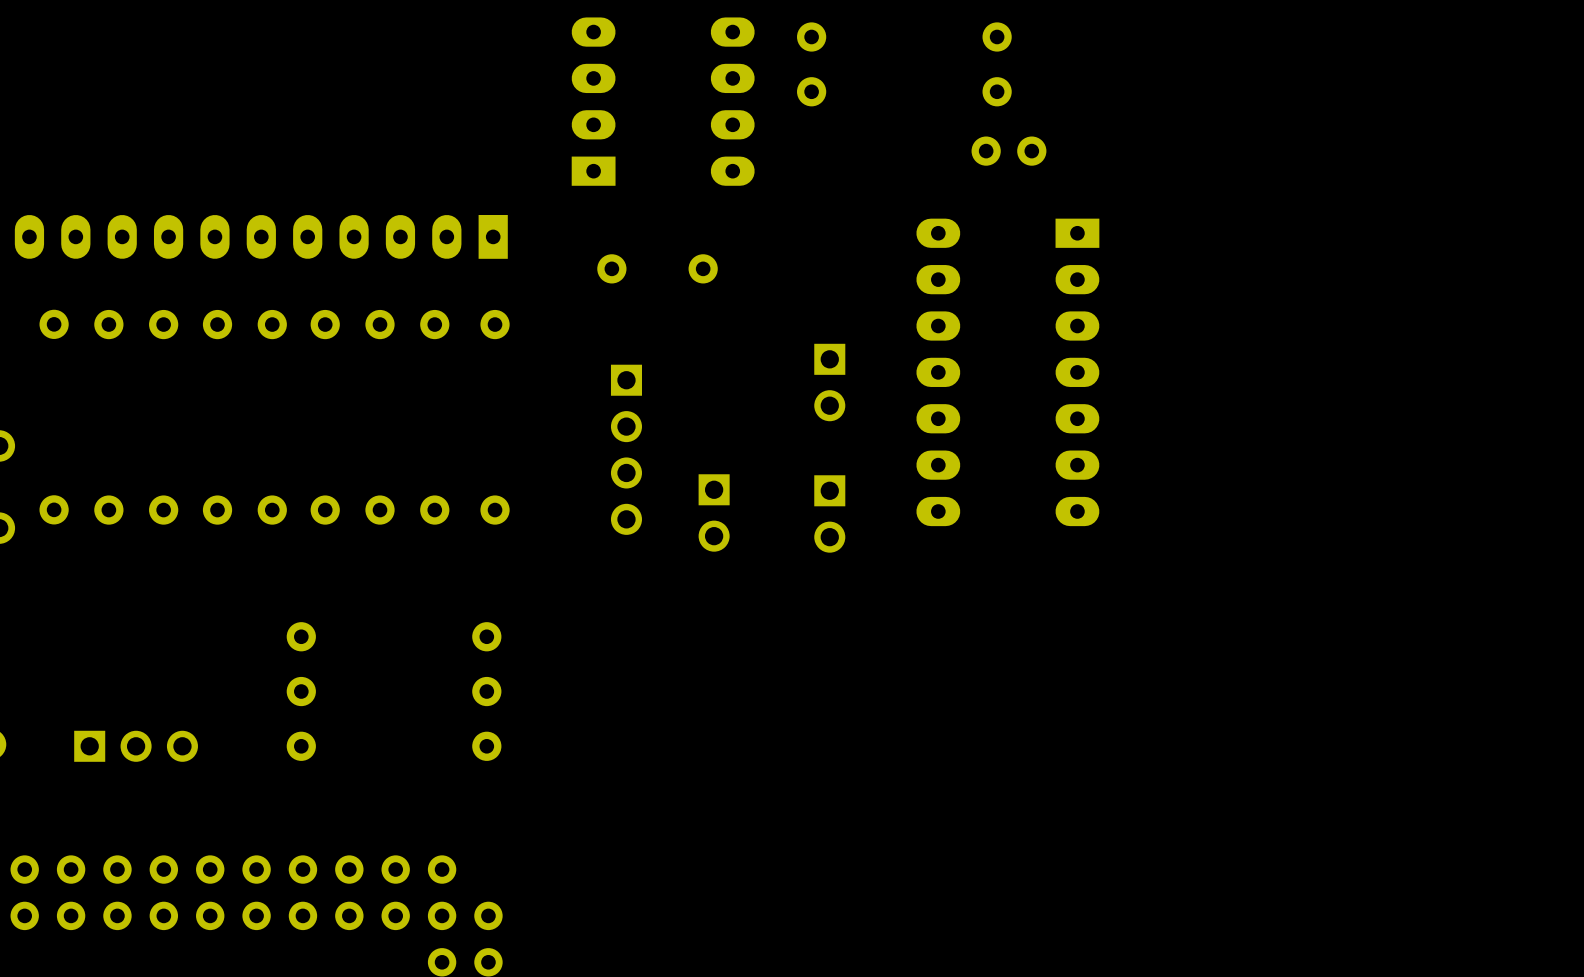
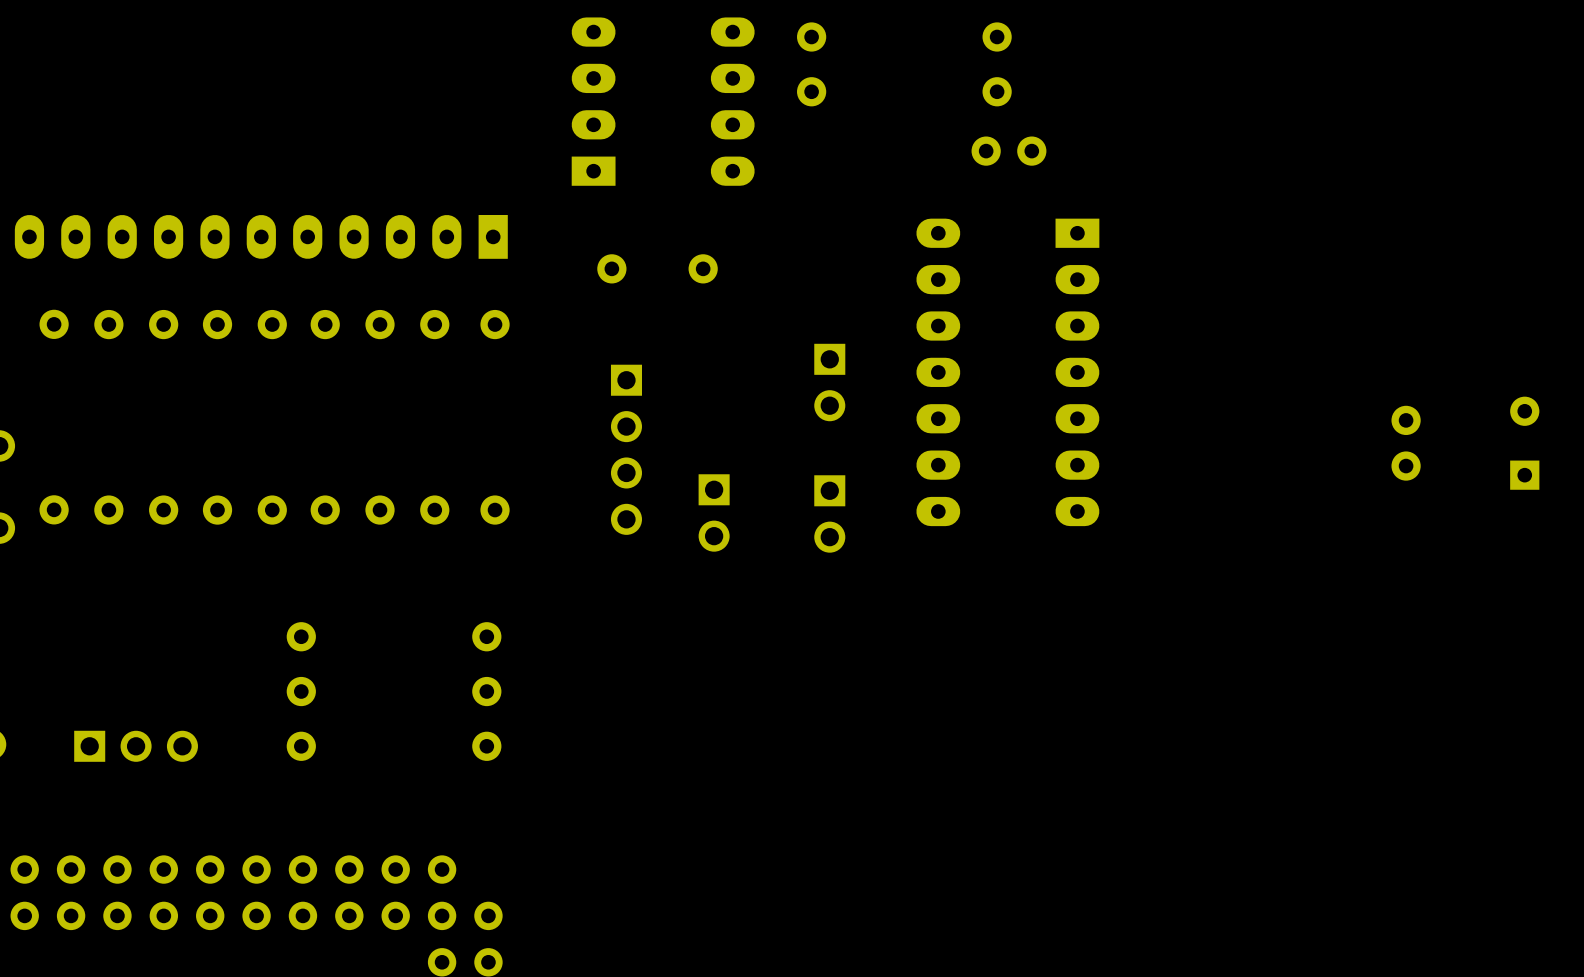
part: none -> (1406, 443)
part: none -> (1524, 443)

